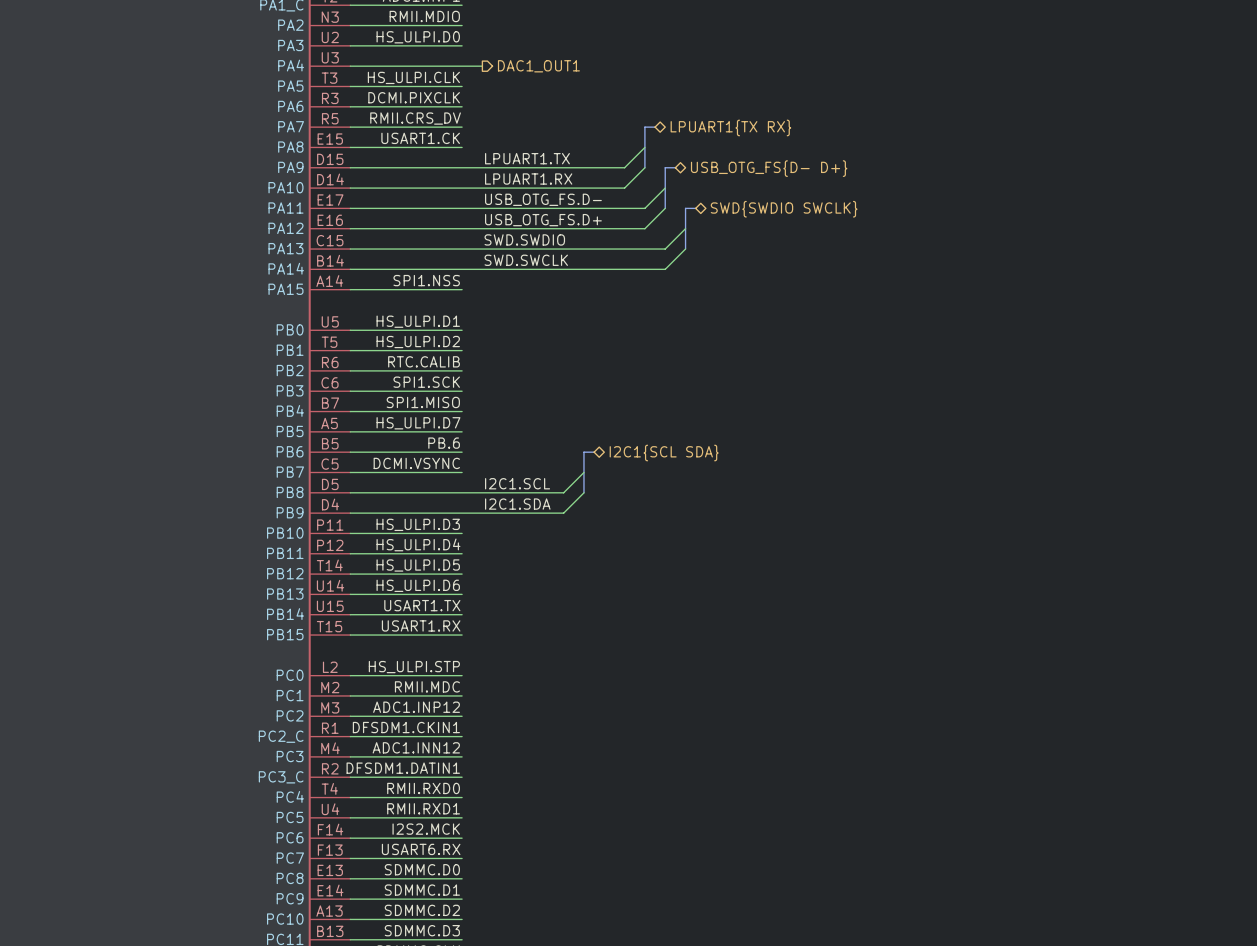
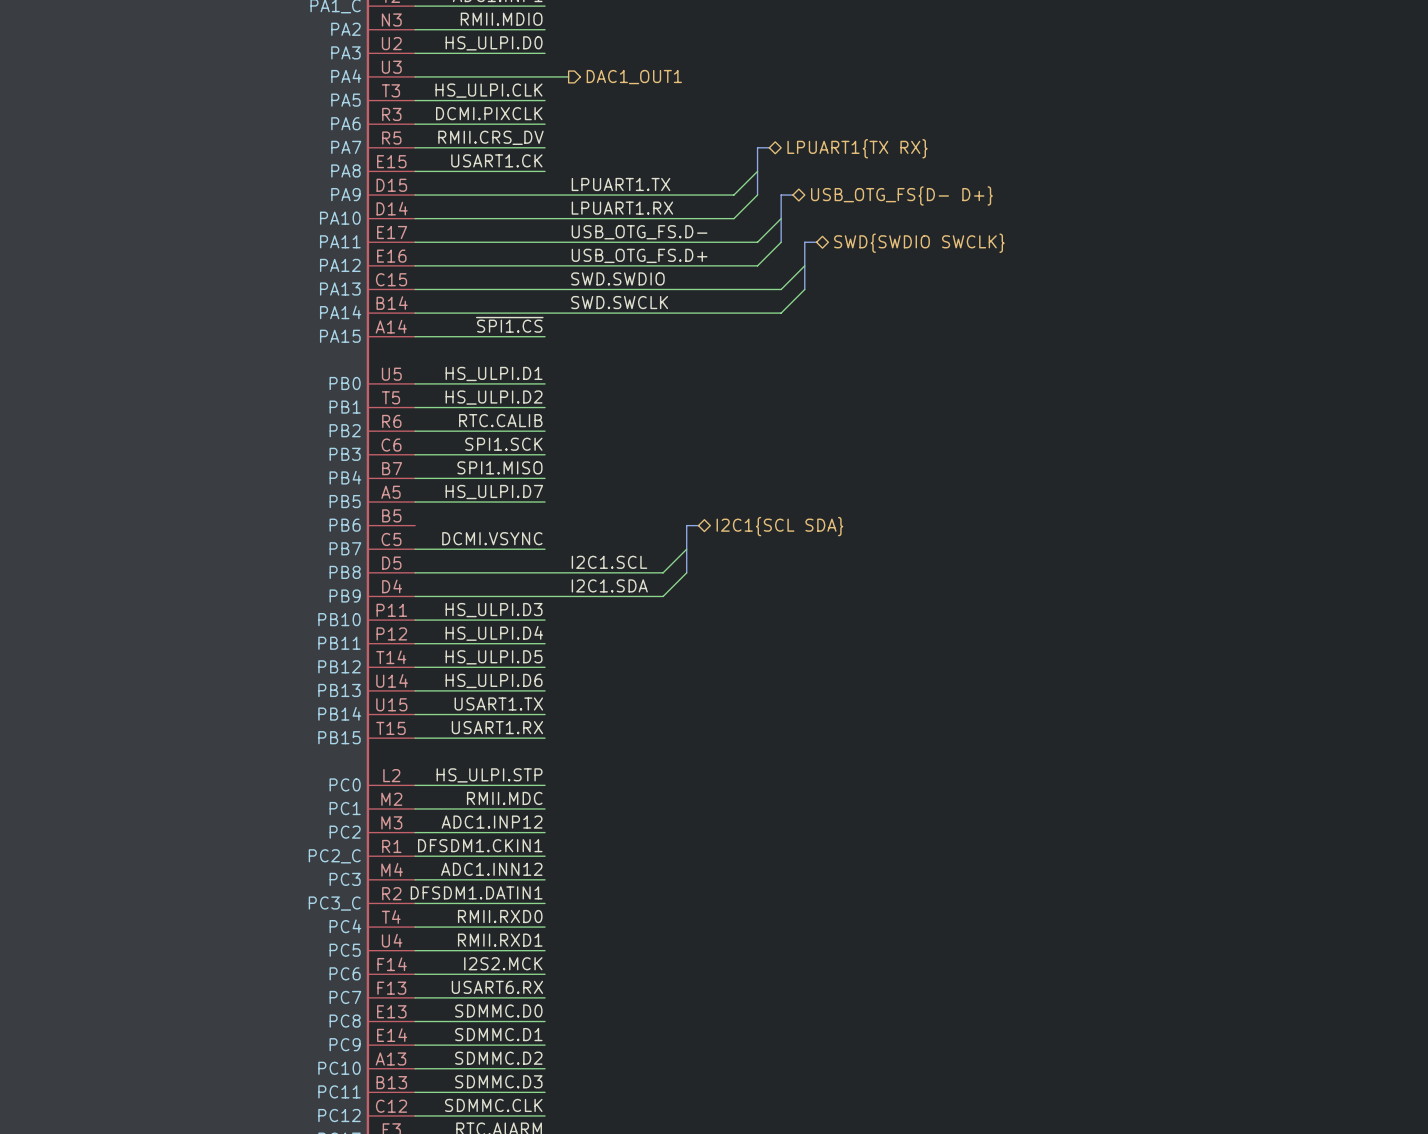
label: SPI1.NSS (426, 280) -> ~{SPI1.CS} (509, 324)
label: PB.6 (444, 443) -> none
wire: (350, 452) (462, 452) -> none

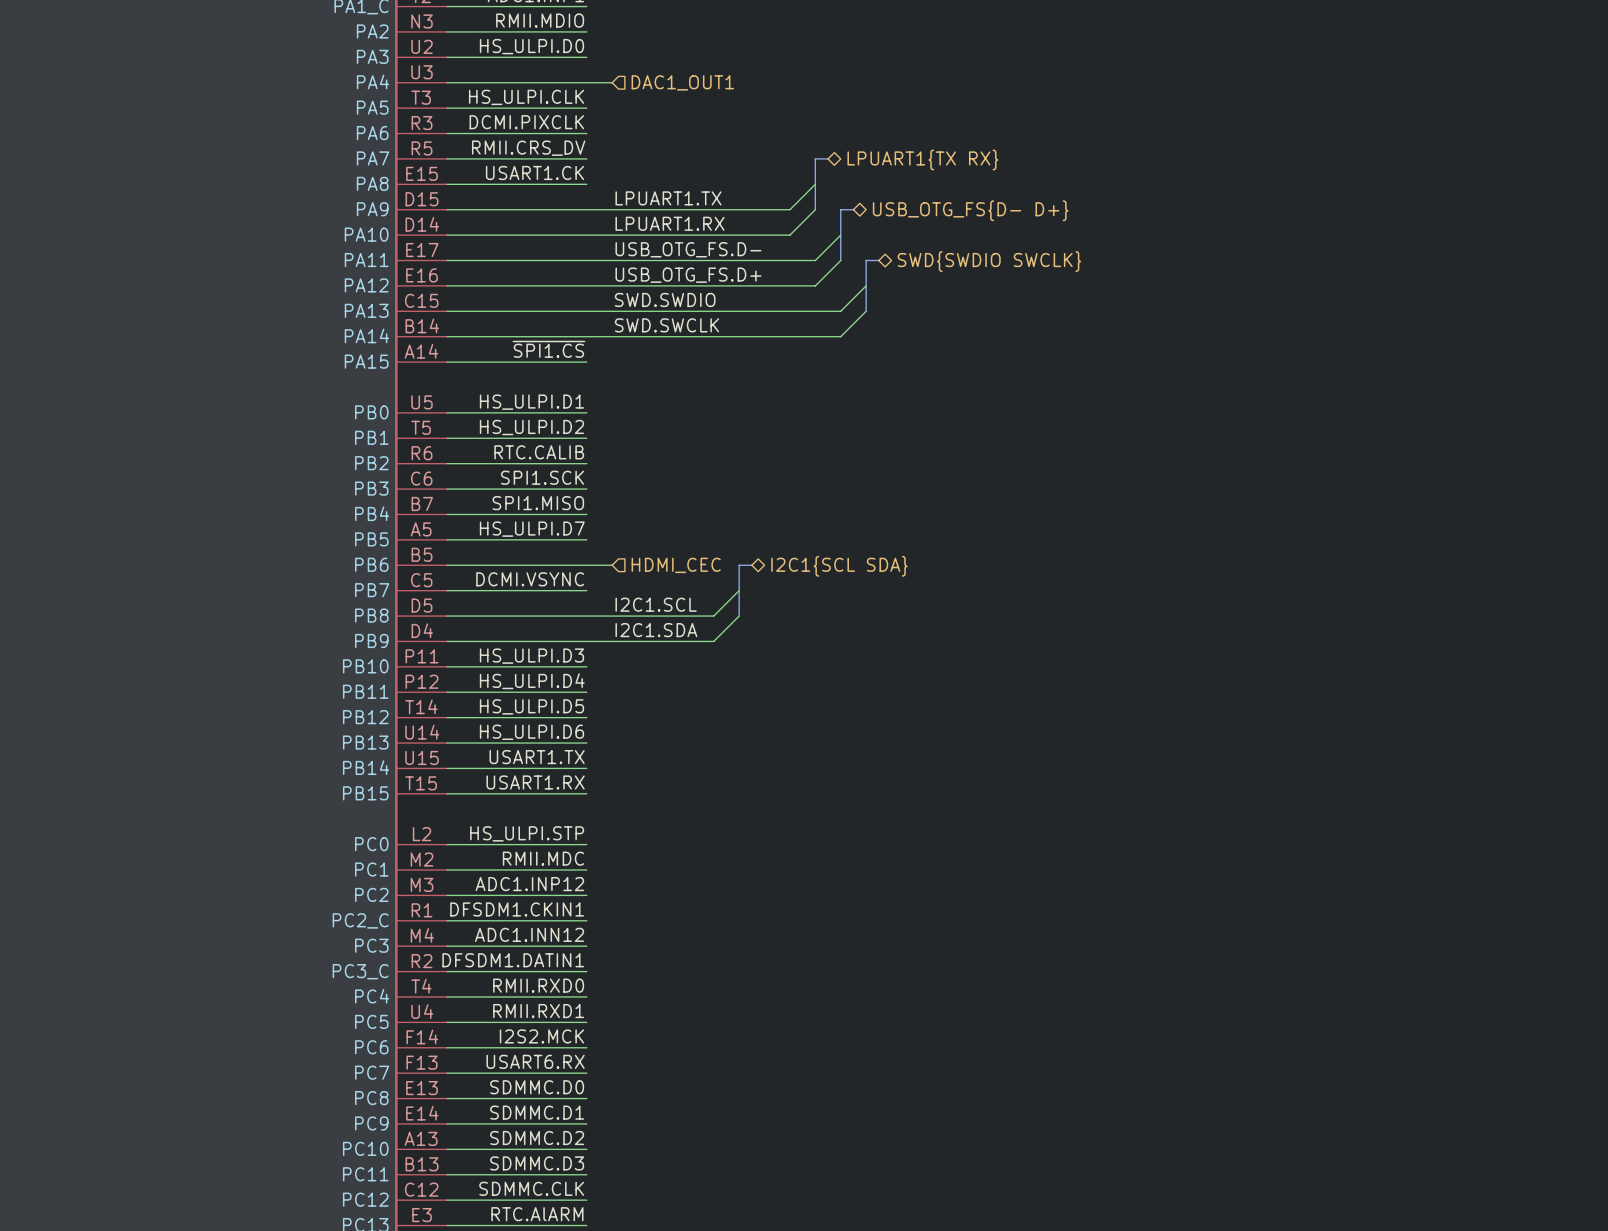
hierarchical label shape: output (634, 77) -> input (682, 82)
wire: none -> (447, 565) (612, 565)
hierarchical label: none -> HDMI_CEC (676, 565)

